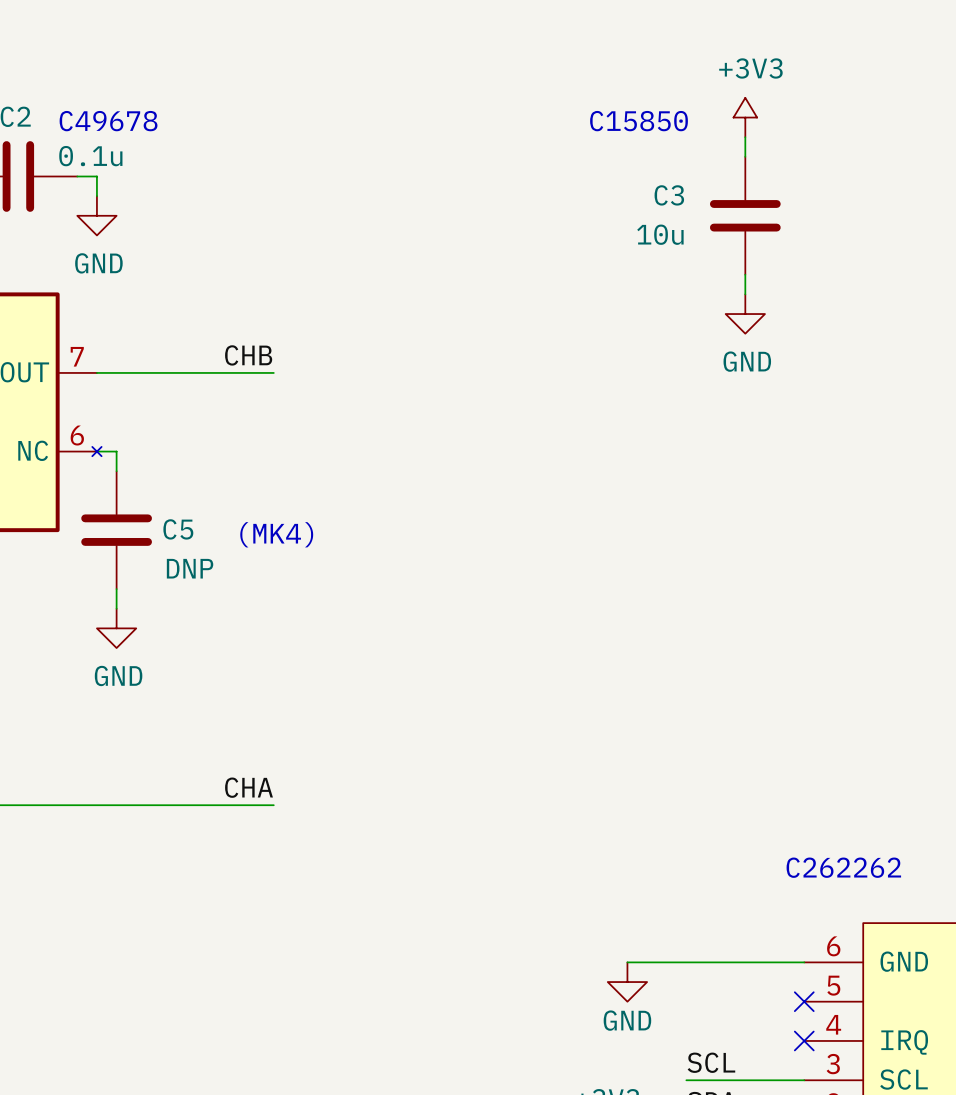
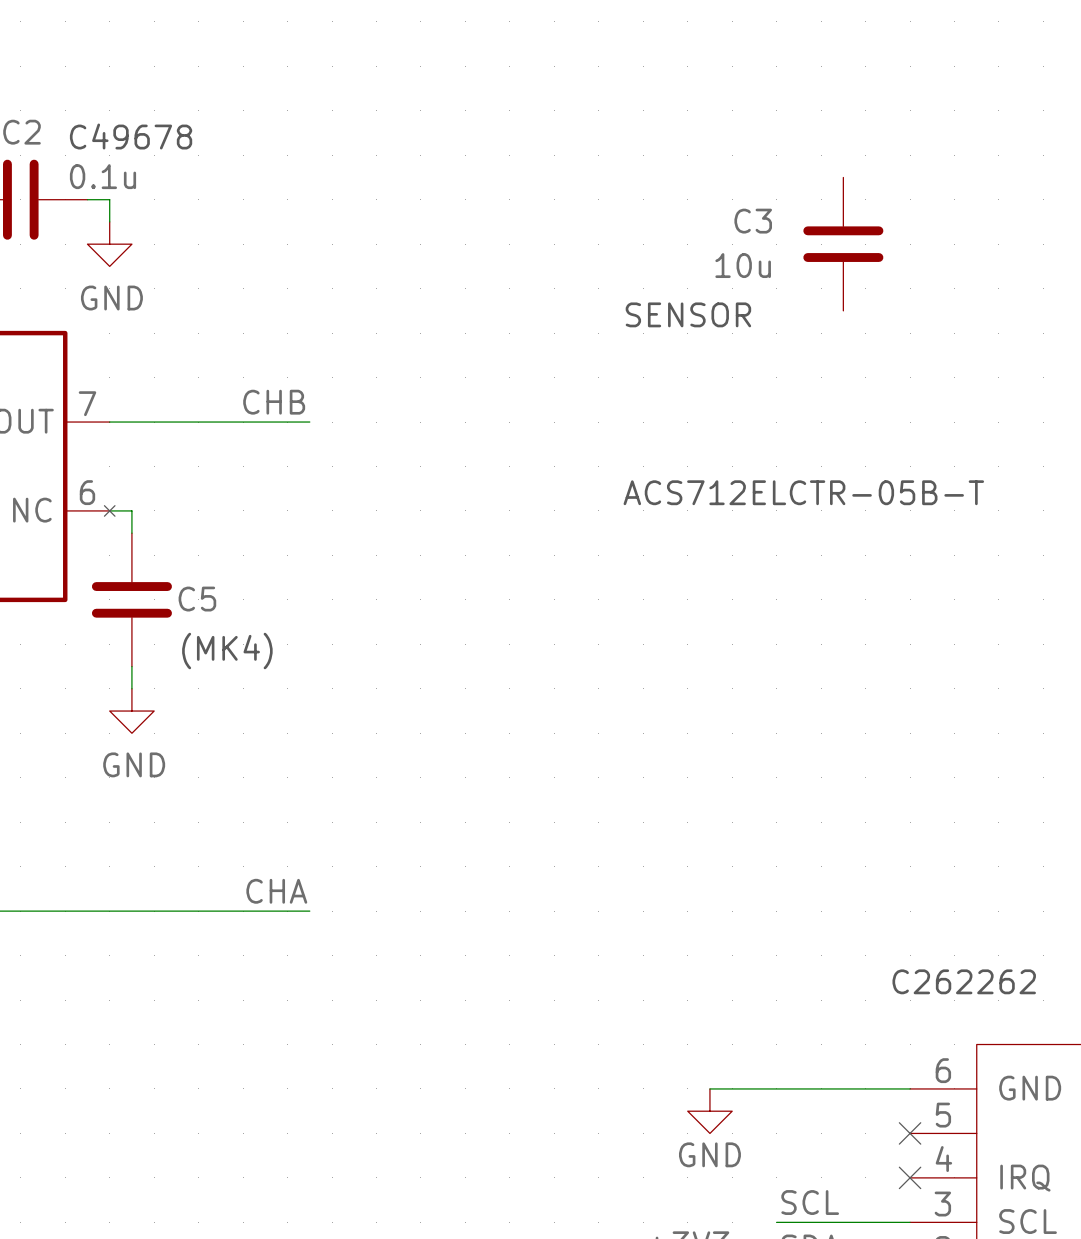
power symbol: +3V3 (745, 117) -> none
text: C15850 (639, 121) -> none
wire: (745, 137) (745, 156) -> none
wire: (745, 274) (745, 294) -> none
text: none -> SENSOR (688, 314)
power symbol: GND (745, 314) -> none
text: none -> ACS712ELCTR-05B-T (803, 492)
text position: (MK4) (276, 534) -> (MK4) (227, 651)
C5 value: DNP (190, 568) -> none

